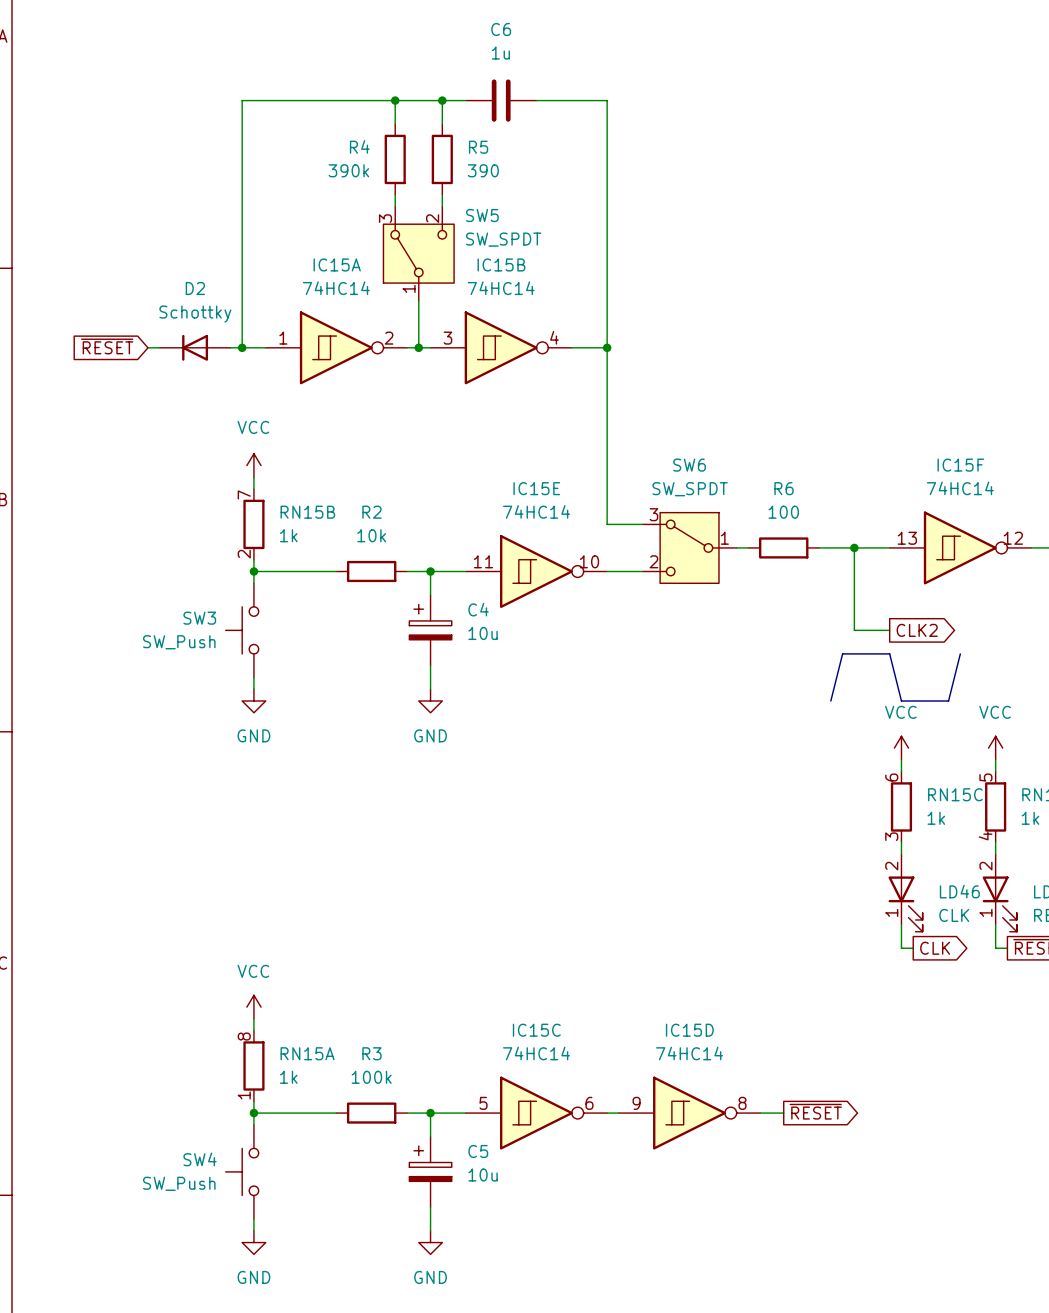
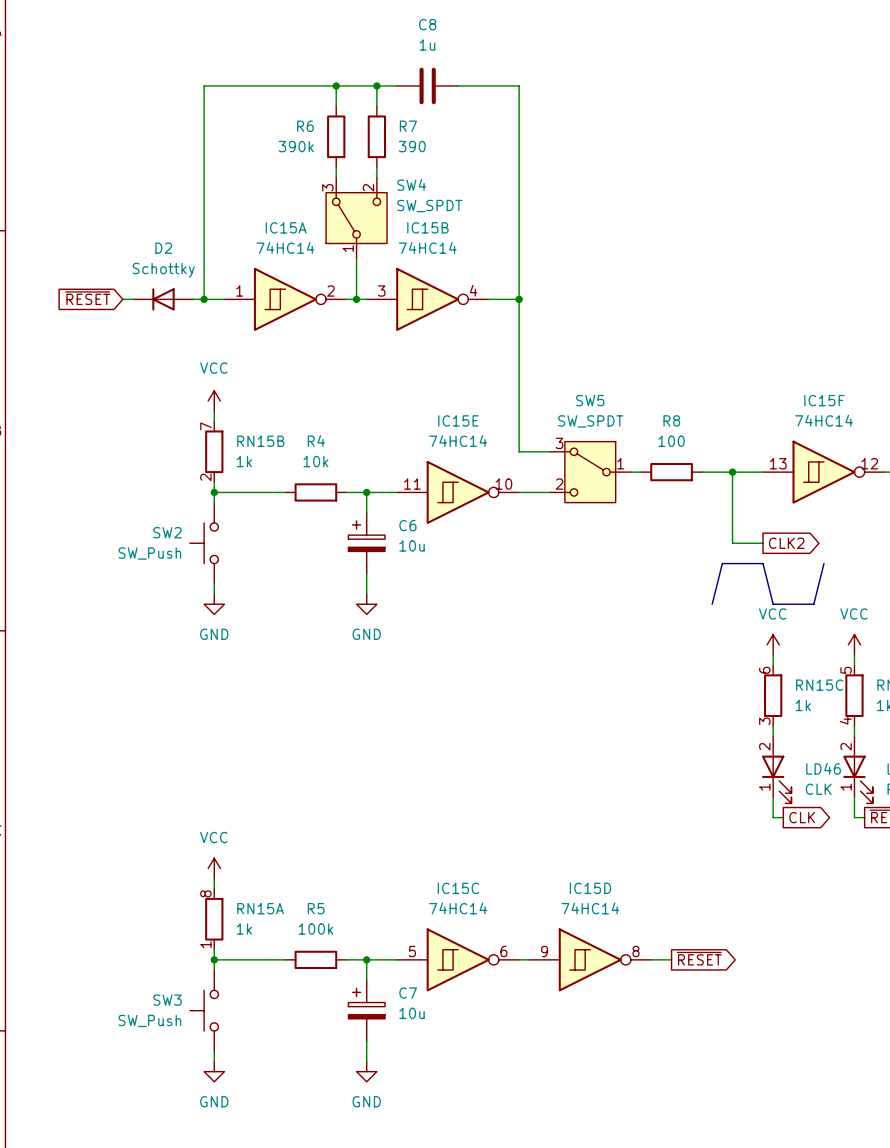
C6 name: C6 (501, 29) -> C8 (427, 24)
R4 name: R4 (359, 146) -> R6 (305, 126)
R5 name: R5 (478, 147) -> R7 (408, 126)
SW5 name: SW5 (482, 215) -> SW4 (411, 184)
SW6 name: SW6 (689, 465) -> SW5 (590, 400)
R6 name: R6 (784, 488) -> R8 (671, 420)
R2 name: R2 (371, 512) -> R4 (316, 441)
C4 name: C4 (478, 609) -> C6 (407, 525)
SW3 name: SW3 (199, 618) -> SW2 (167, 532)
R3 name: R3 (371, 1053) -> R5 (316, 908)
C5 name: C5 (478, 1151) -> C7 (408, 993)
SW4 name: SW4 (200, 1159) -> SW3 (167, 1000)

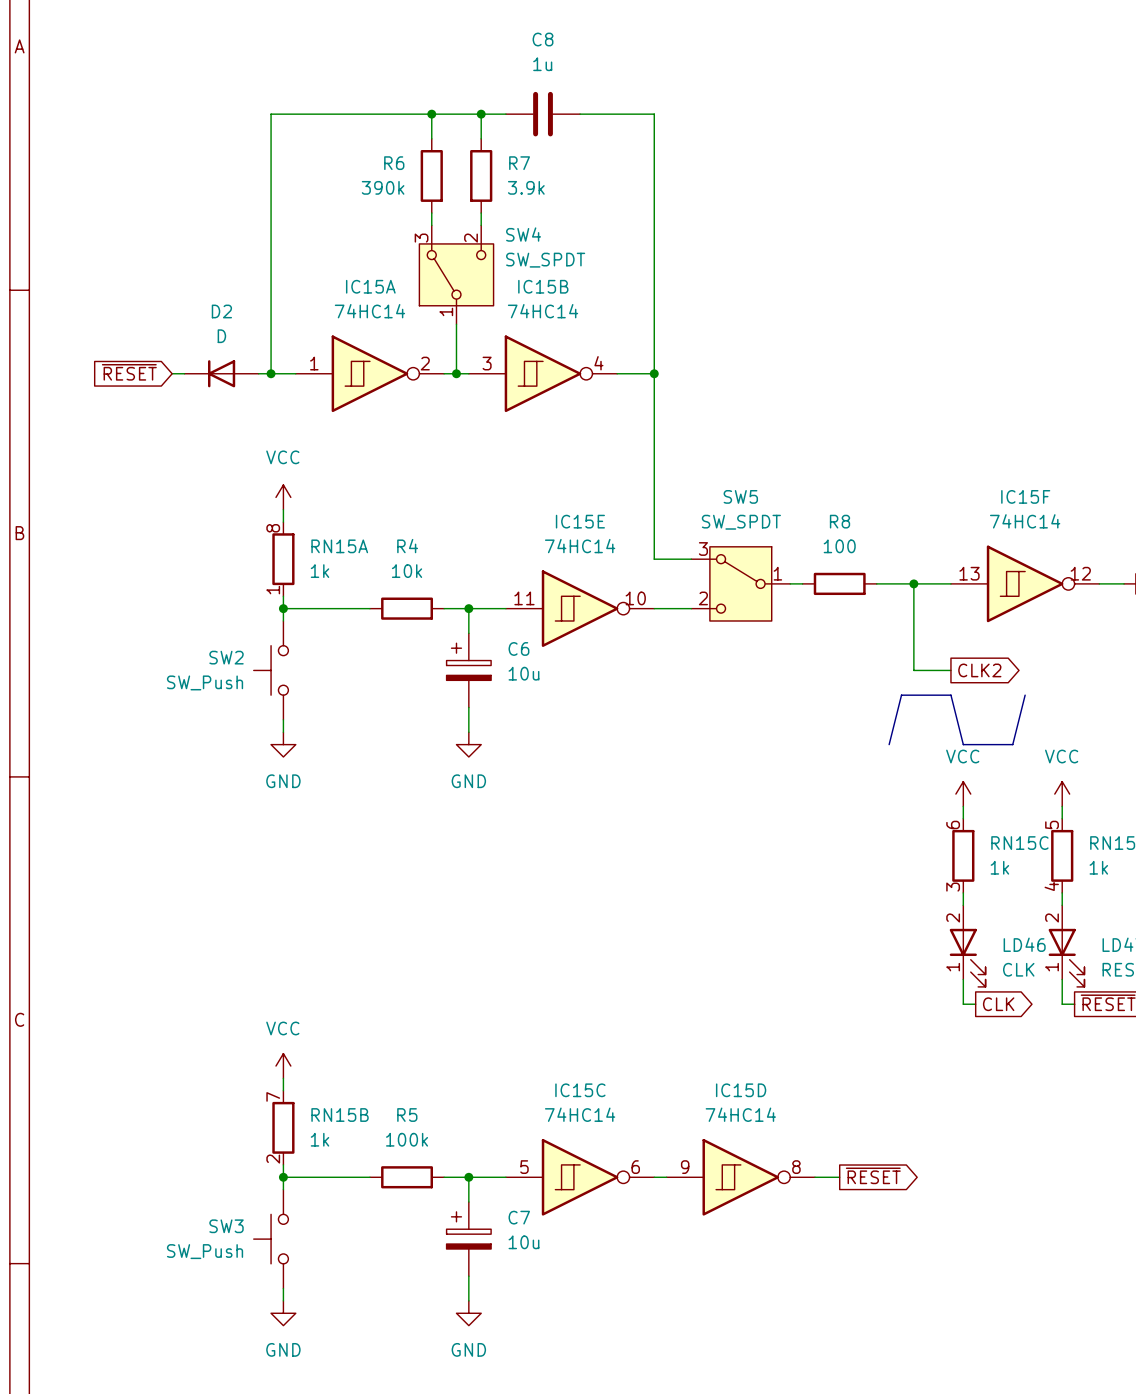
R7 value: 390 (412, 146) -> 3.9k (526, 187)
D2 value: Schottky (163, 270) -> D (221, 336)
RN15B position: (214, 451) -> (283, 1127)
RN15A position: (214, 919) -> (283, 559)

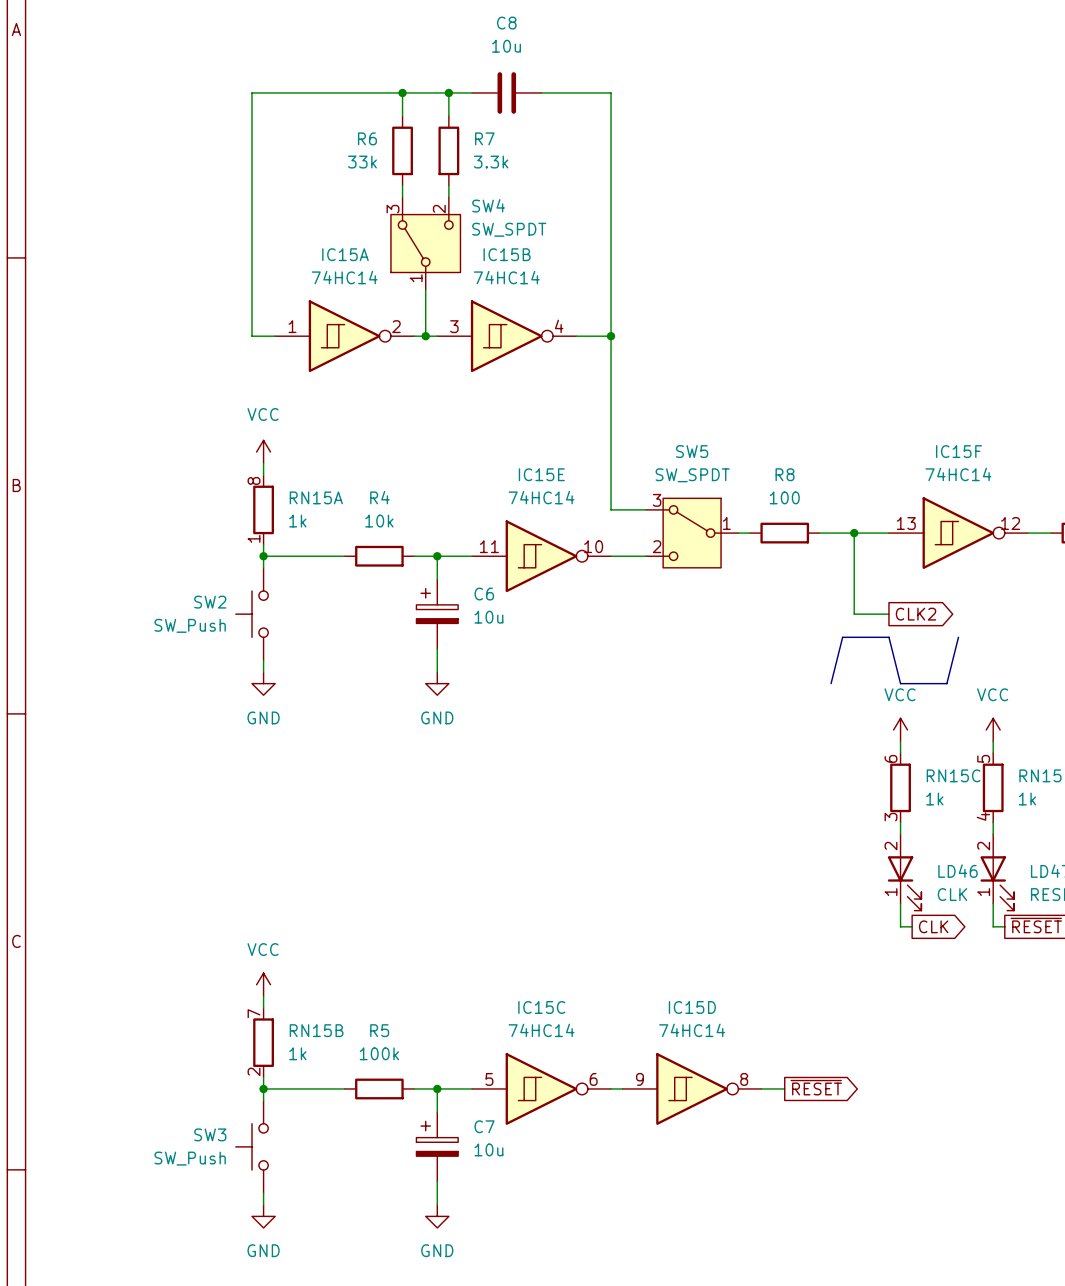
C8 value: 1u (542, 64) -> 10u (506, 46)
R6 value: 390k (383, 187) -> 33k (362, 162)
R7 value: 3.9k (526, 187) -> 3.3k (491, 162)
global label: ~{RESET} (129, 372) -> none
wire: (172, 373) (184, 373) -> none
D2: D (221, 373) -> none
wire: (258, 373) (271, 373) -> none
junction: (271, 373) -> none

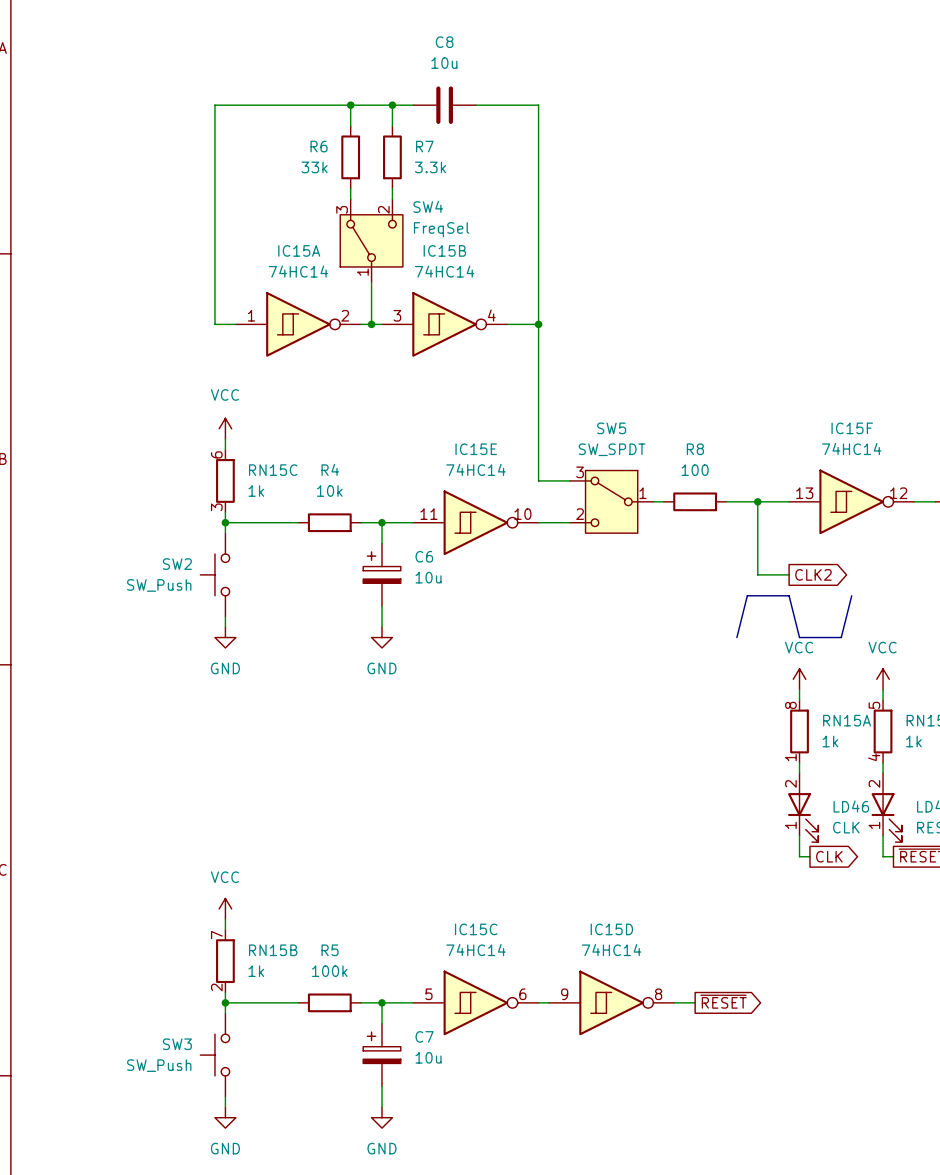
SW4 value: SW_SPDT (509, 229) -> FreqSel (441, 229)
RN15A position: (263, 509) -> (799, 731)
RN15C position: (900, 787) -> (225, 480)

